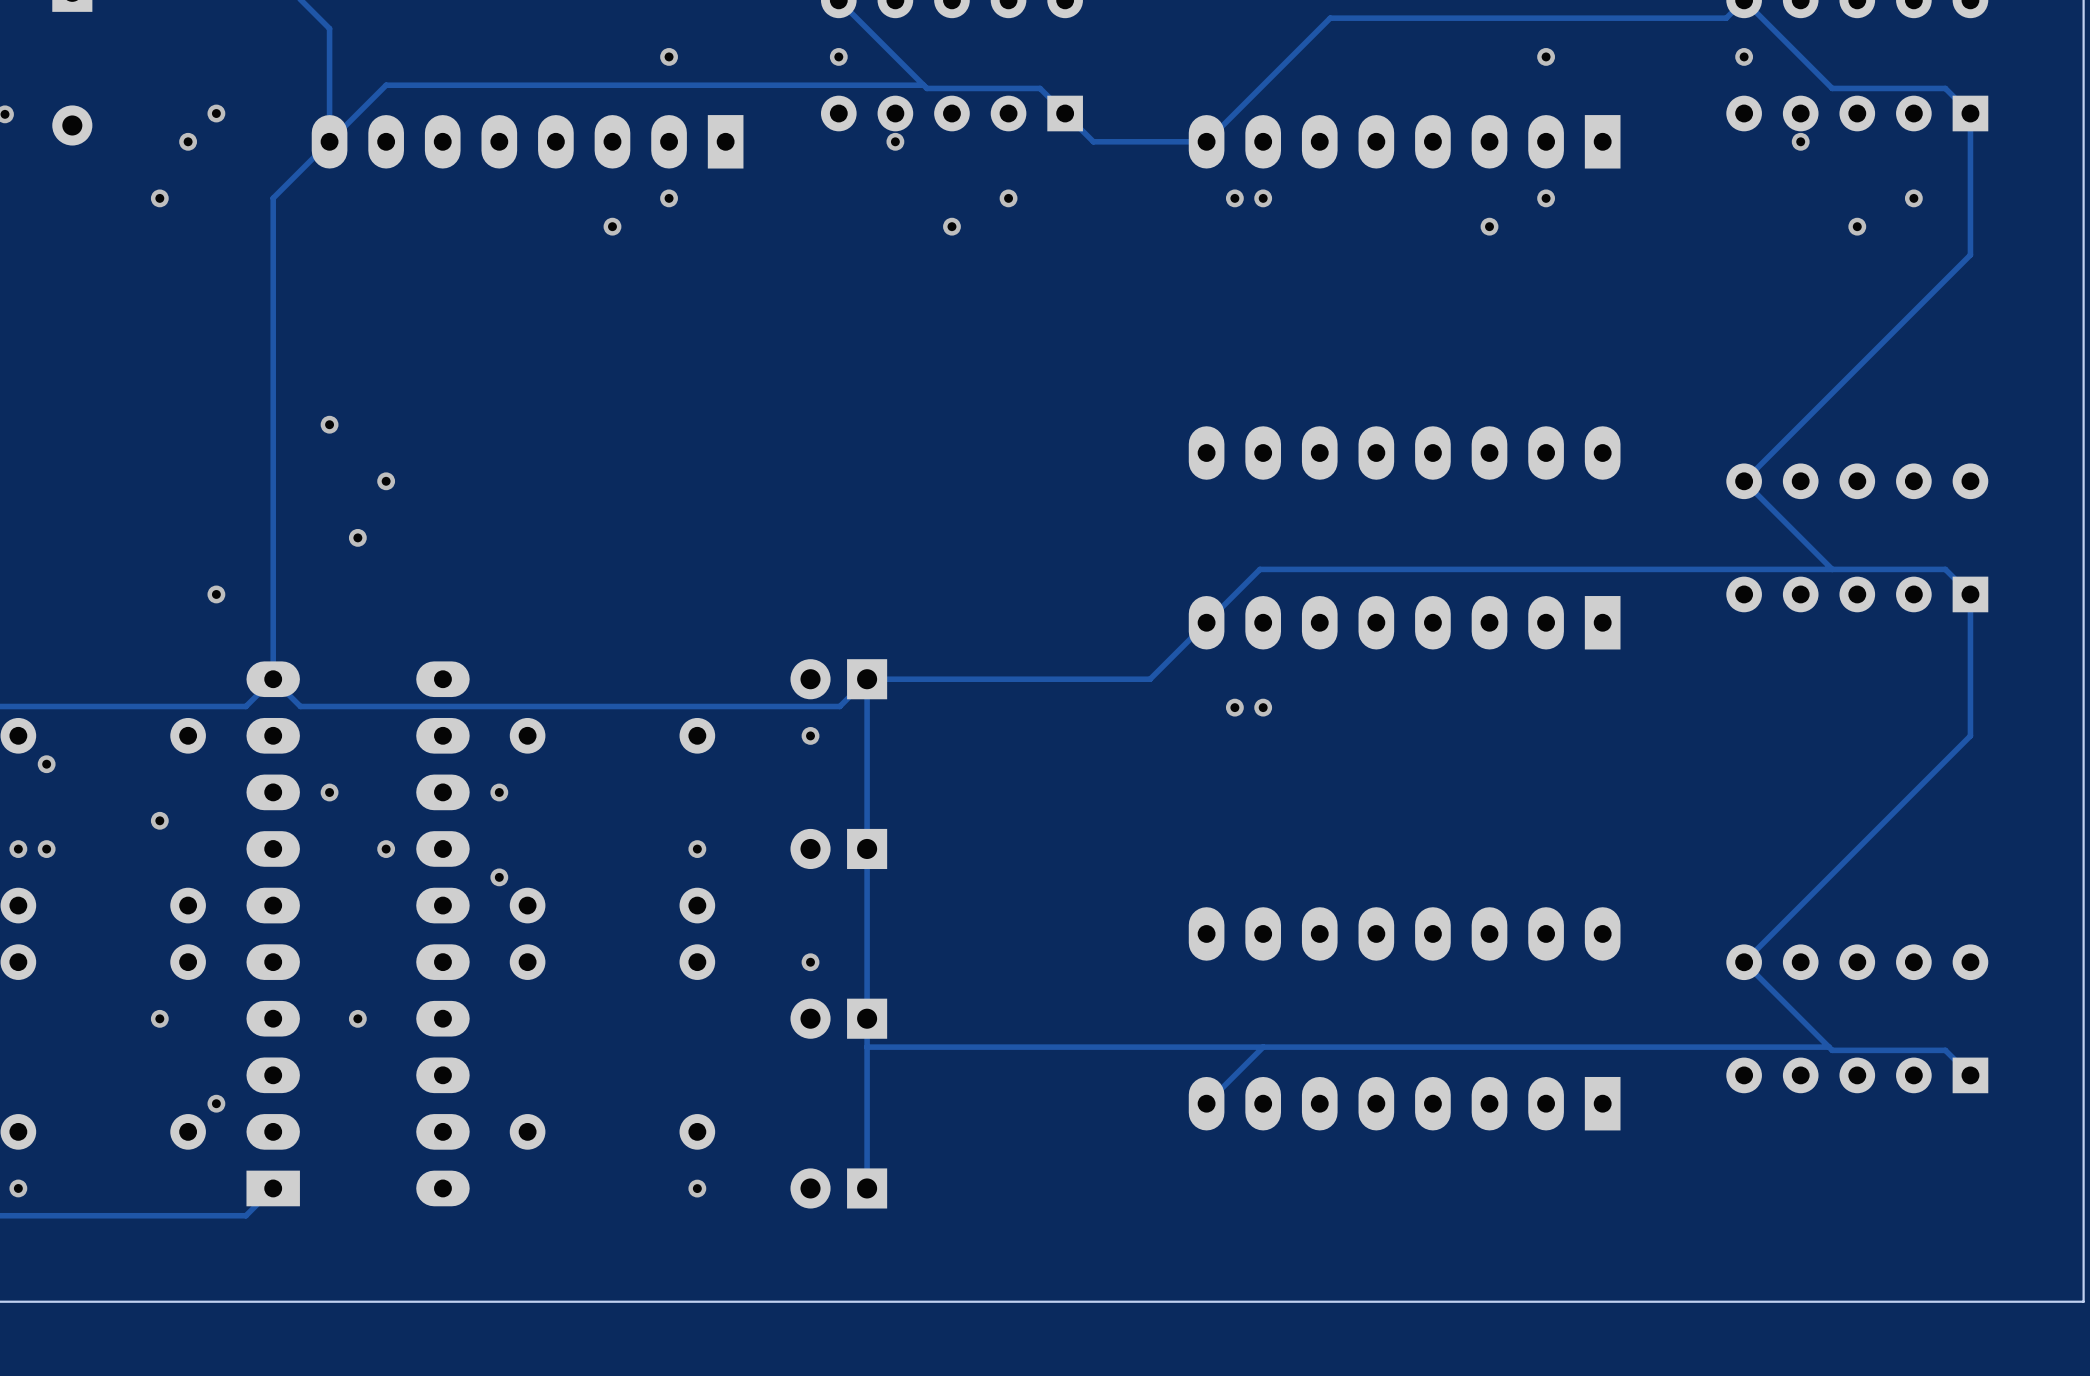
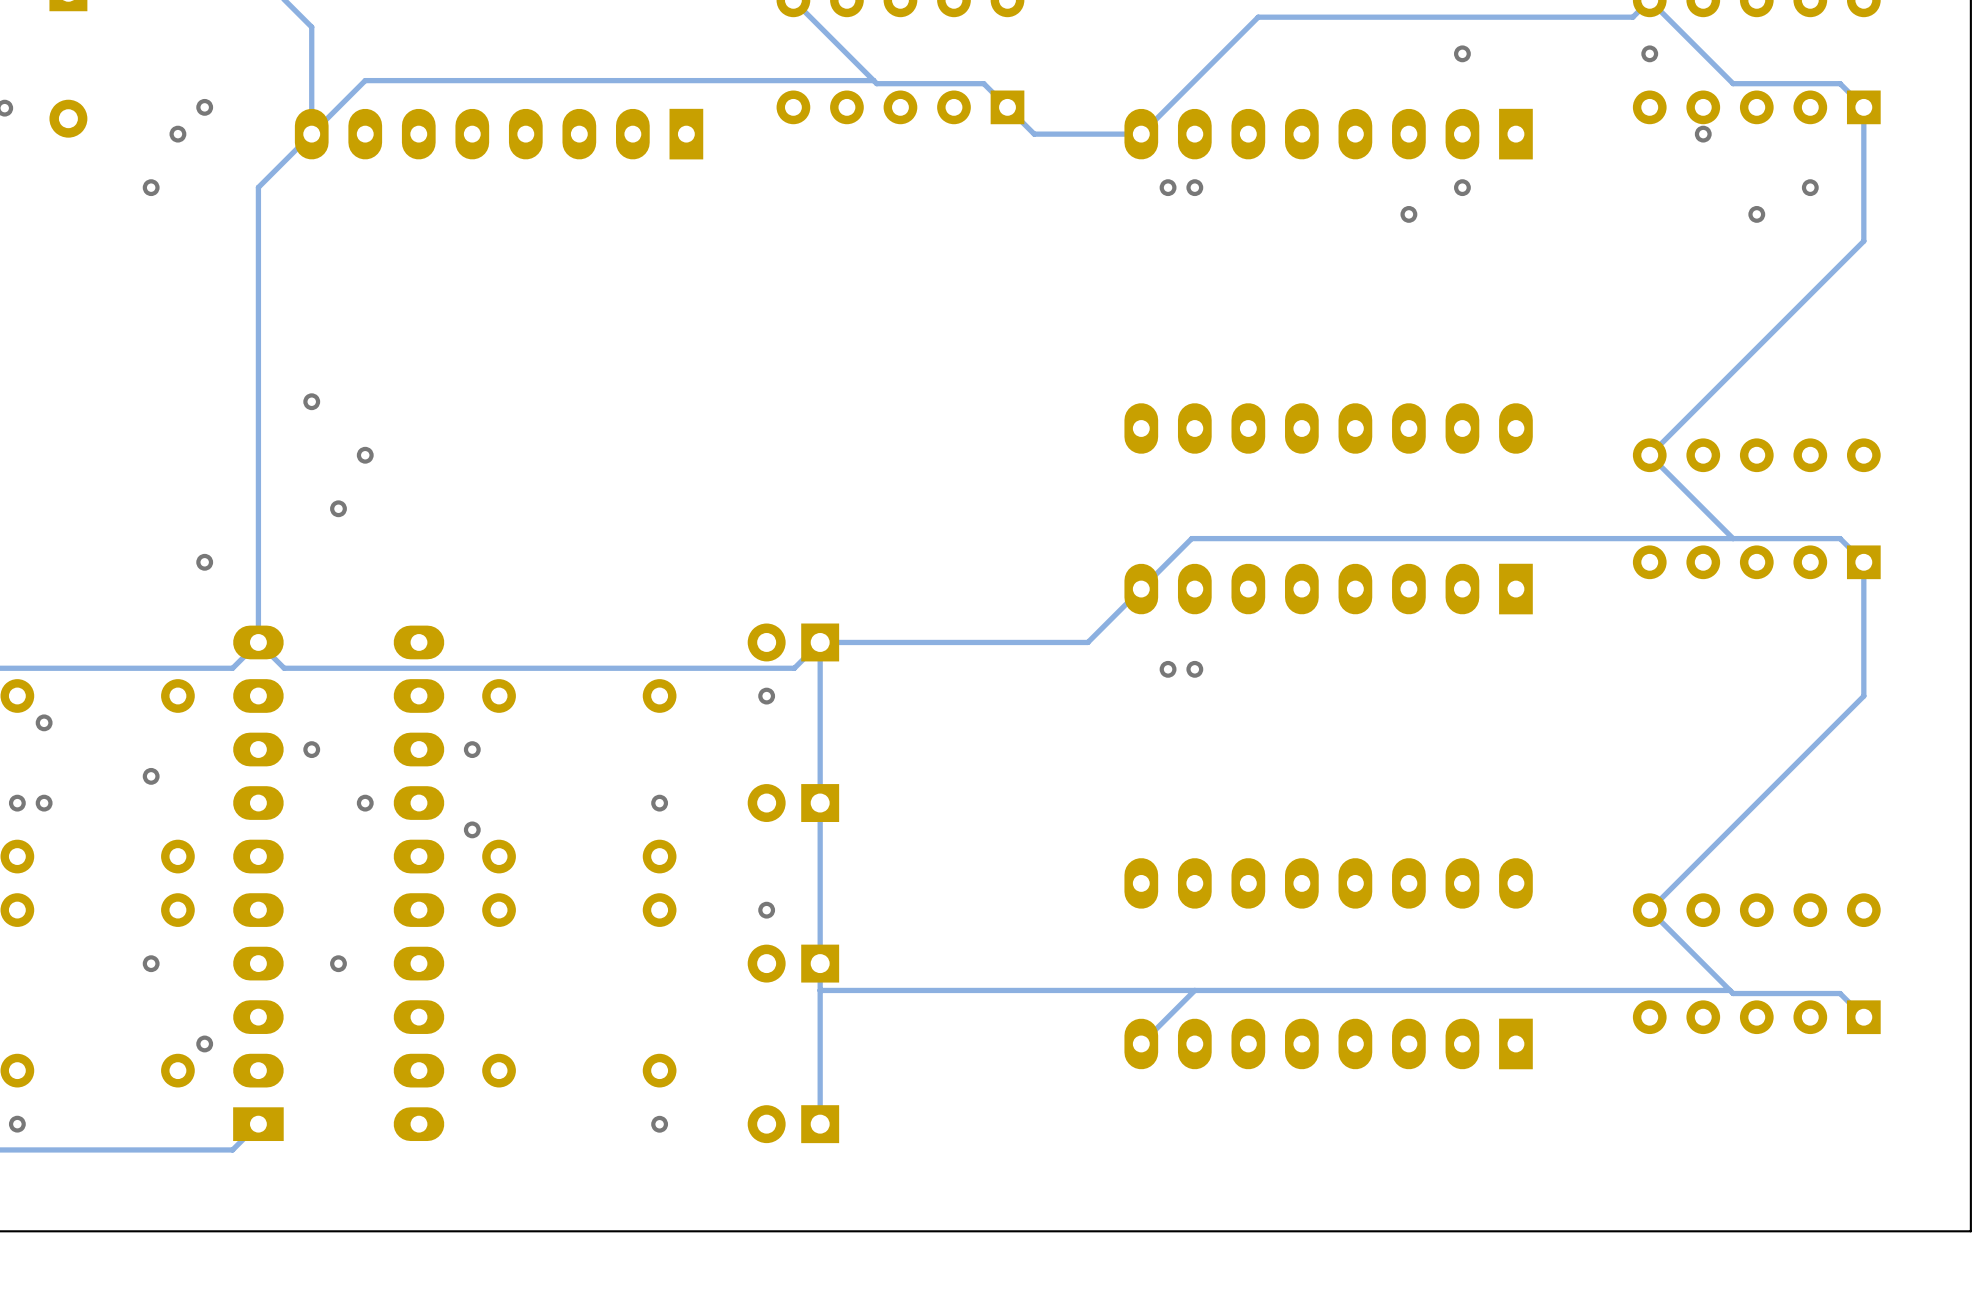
via: (669, 56) -> none
via: (838, 56) -> none
via: (895, 141) -> none
via: (669, 198) -> none
via: (1008, 198) -> none
via: (612, 226) -> none
via: (951, 226) -> none

